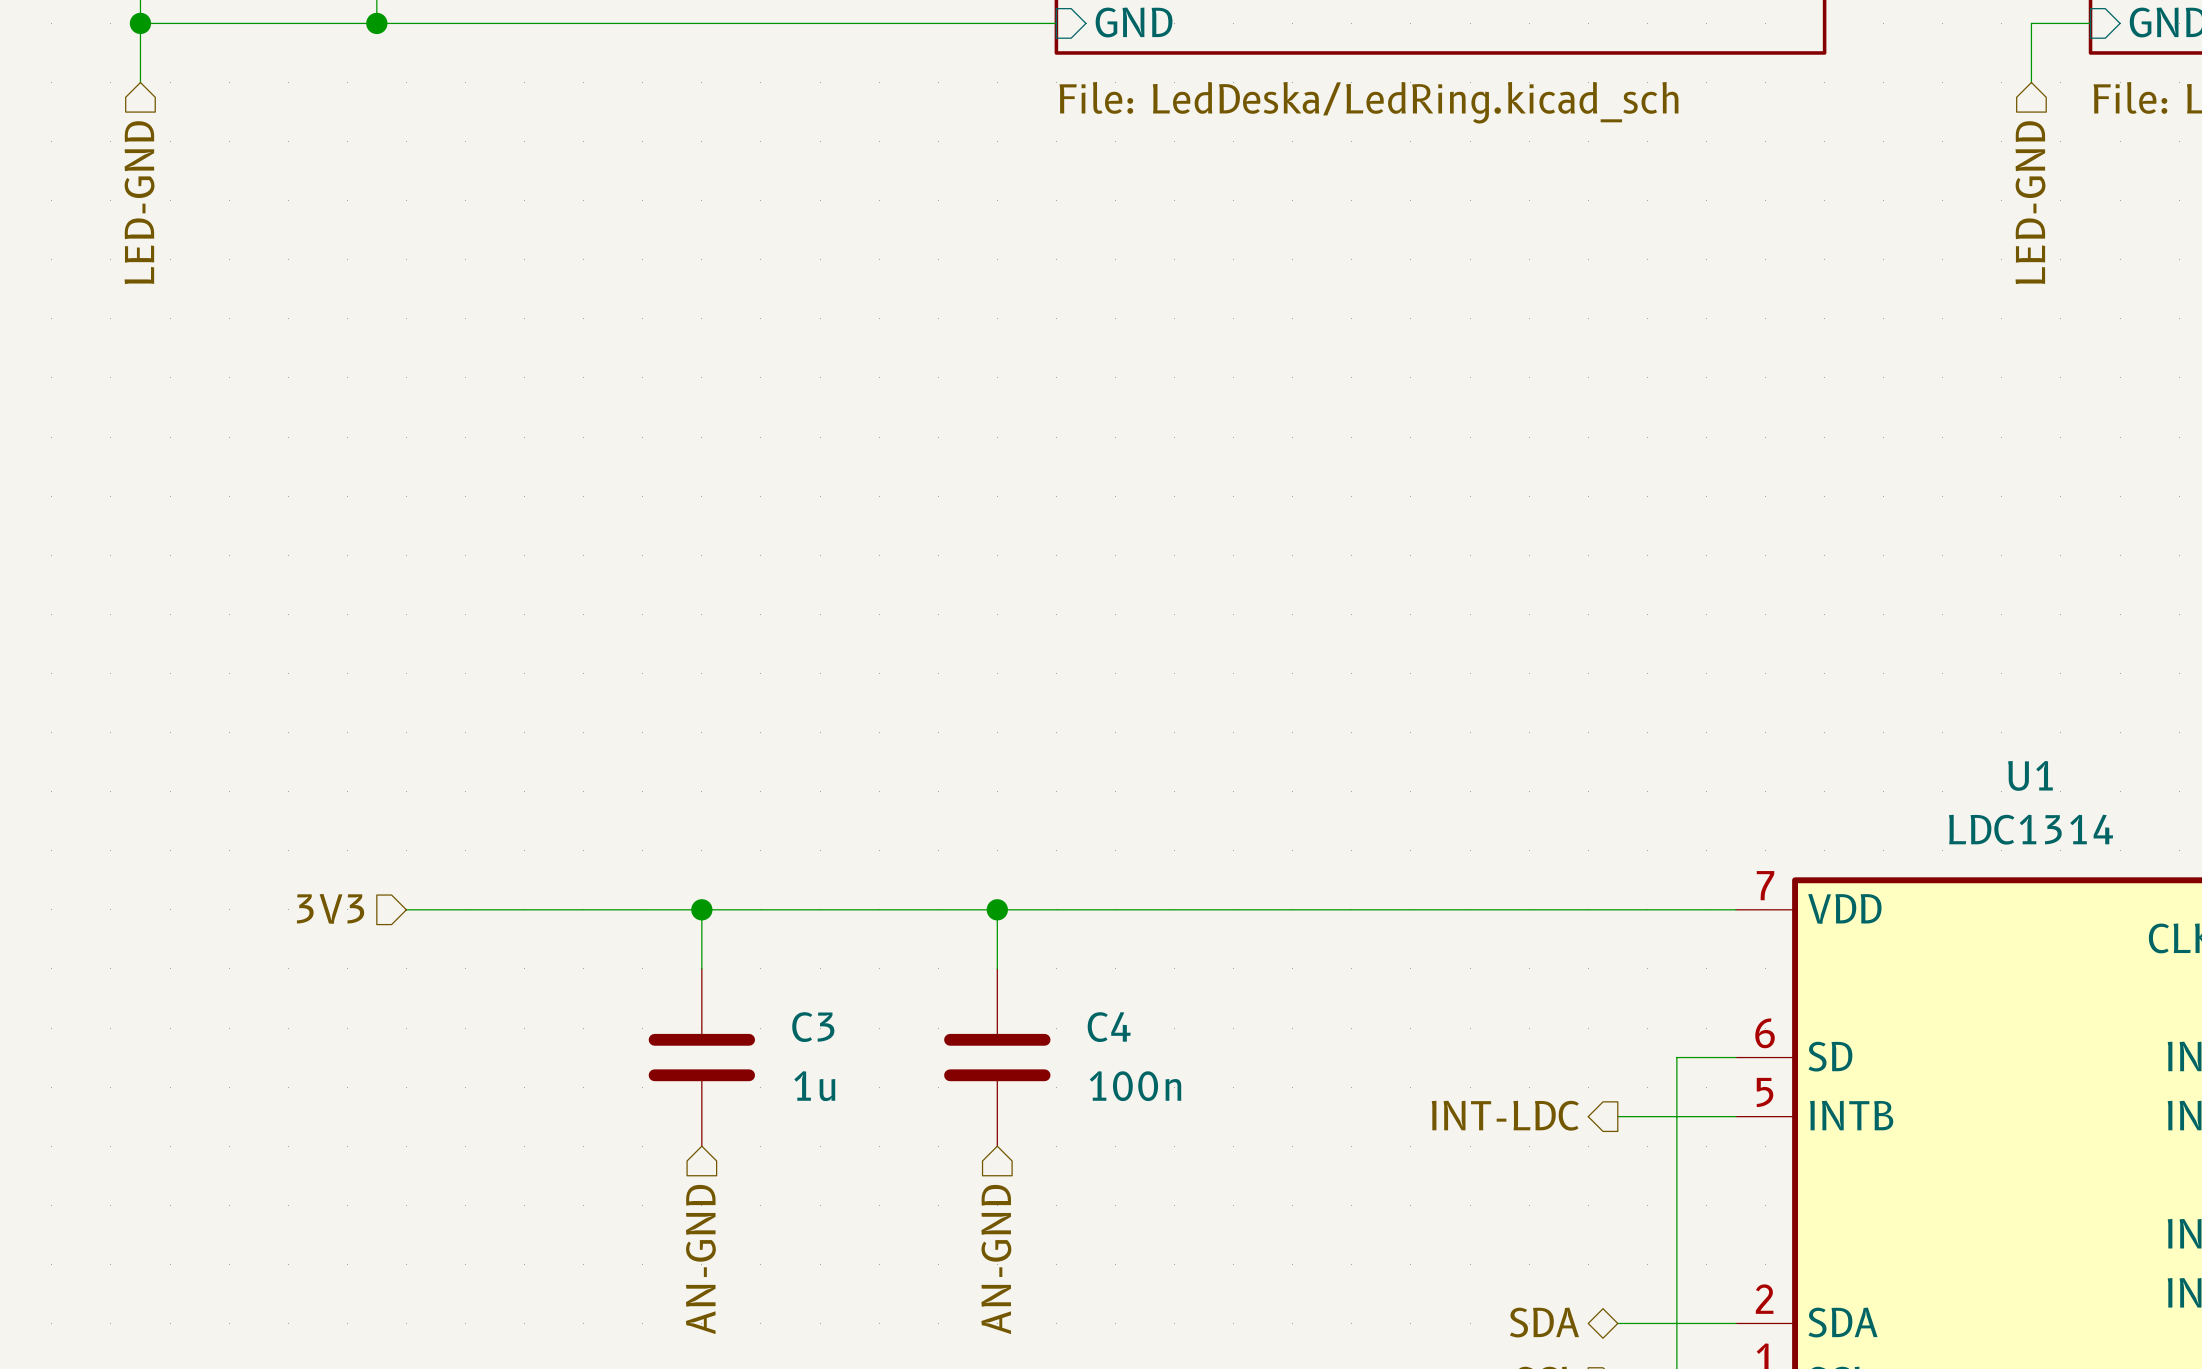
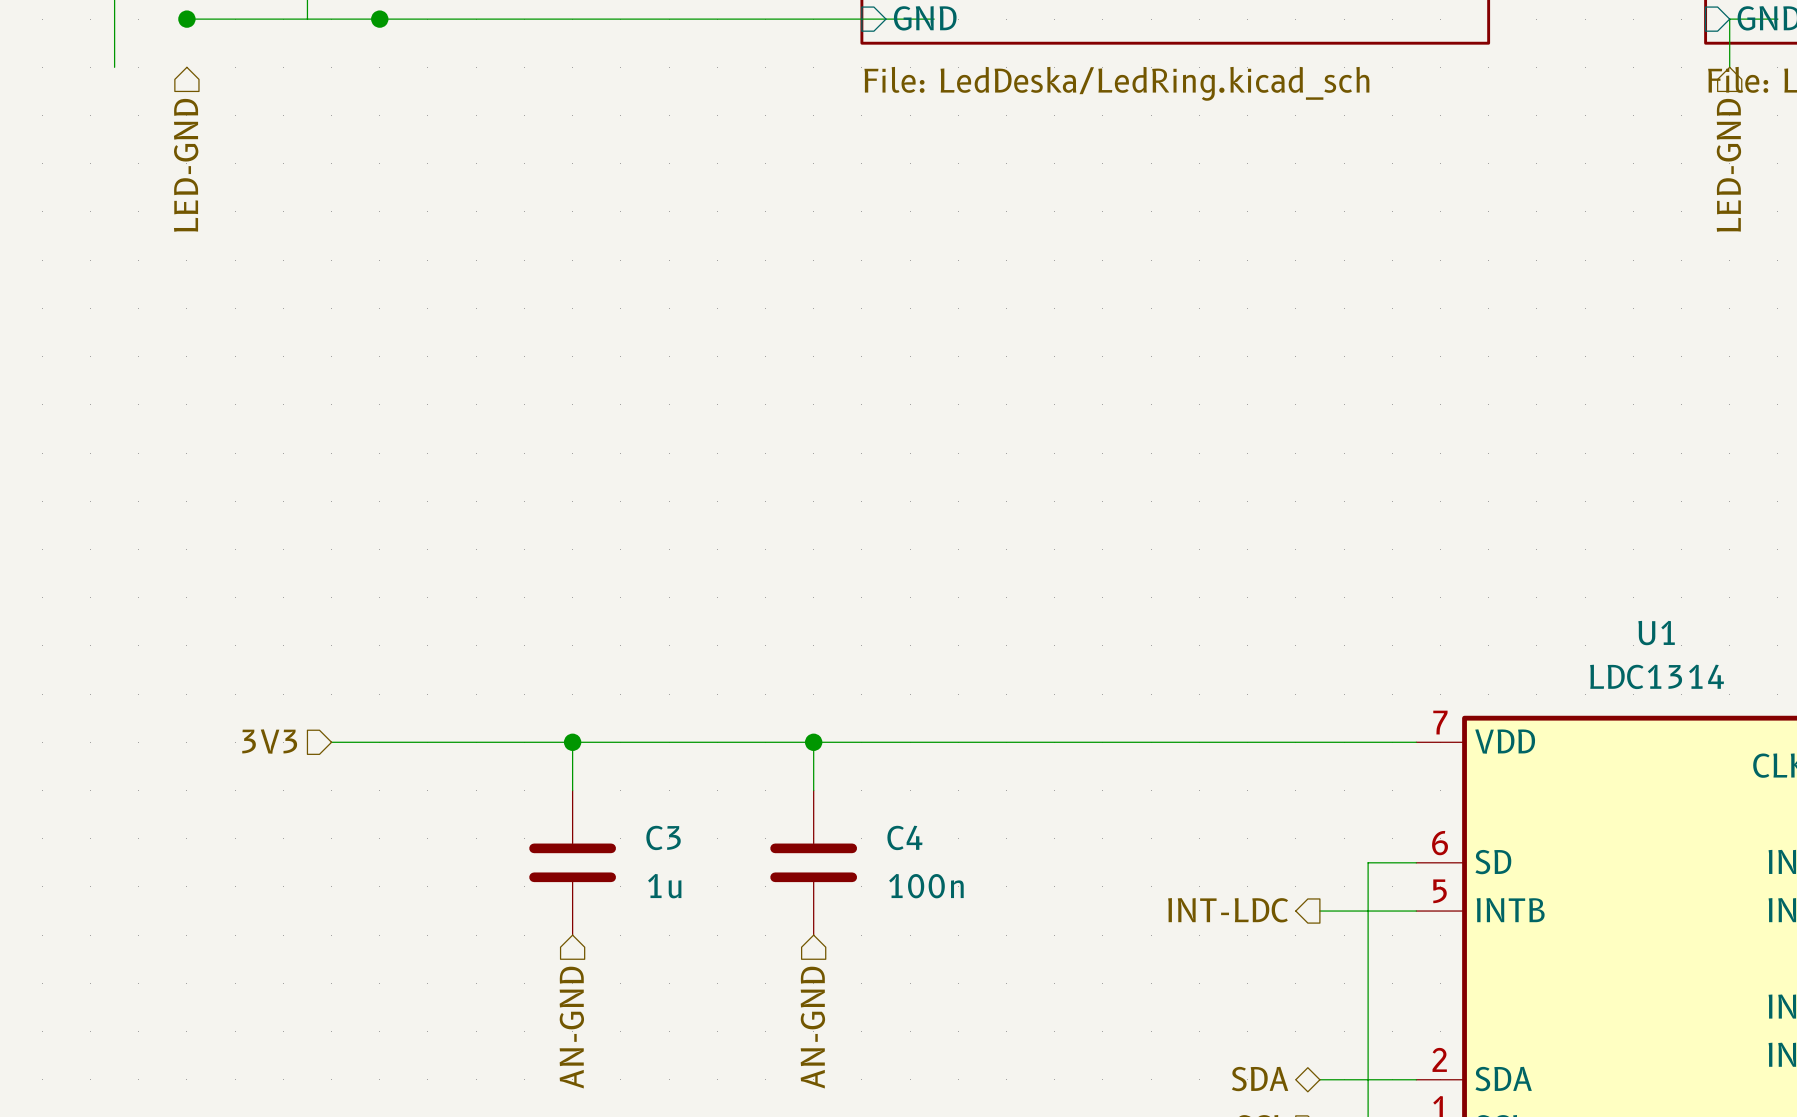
wire: (140, 23) (229, 23) -> none
junction: (140, 23) -> none
junction: none -> (186, 19)
junction: (376, 23) -> none
junction: none -> (379, 19)
wire: none -> (861, 19) (934, 19)
wire: (2090, 23) (2031, 23) (2031, 82) -> (1777, 19) (1729, 19) (1729, 67)
hierarchical label position: LED-GND (139, 202) -> LED-GND (186, 165)
hierarchical label position: LED-GND (2030, 202) -> LED-GND (1728, 165)

